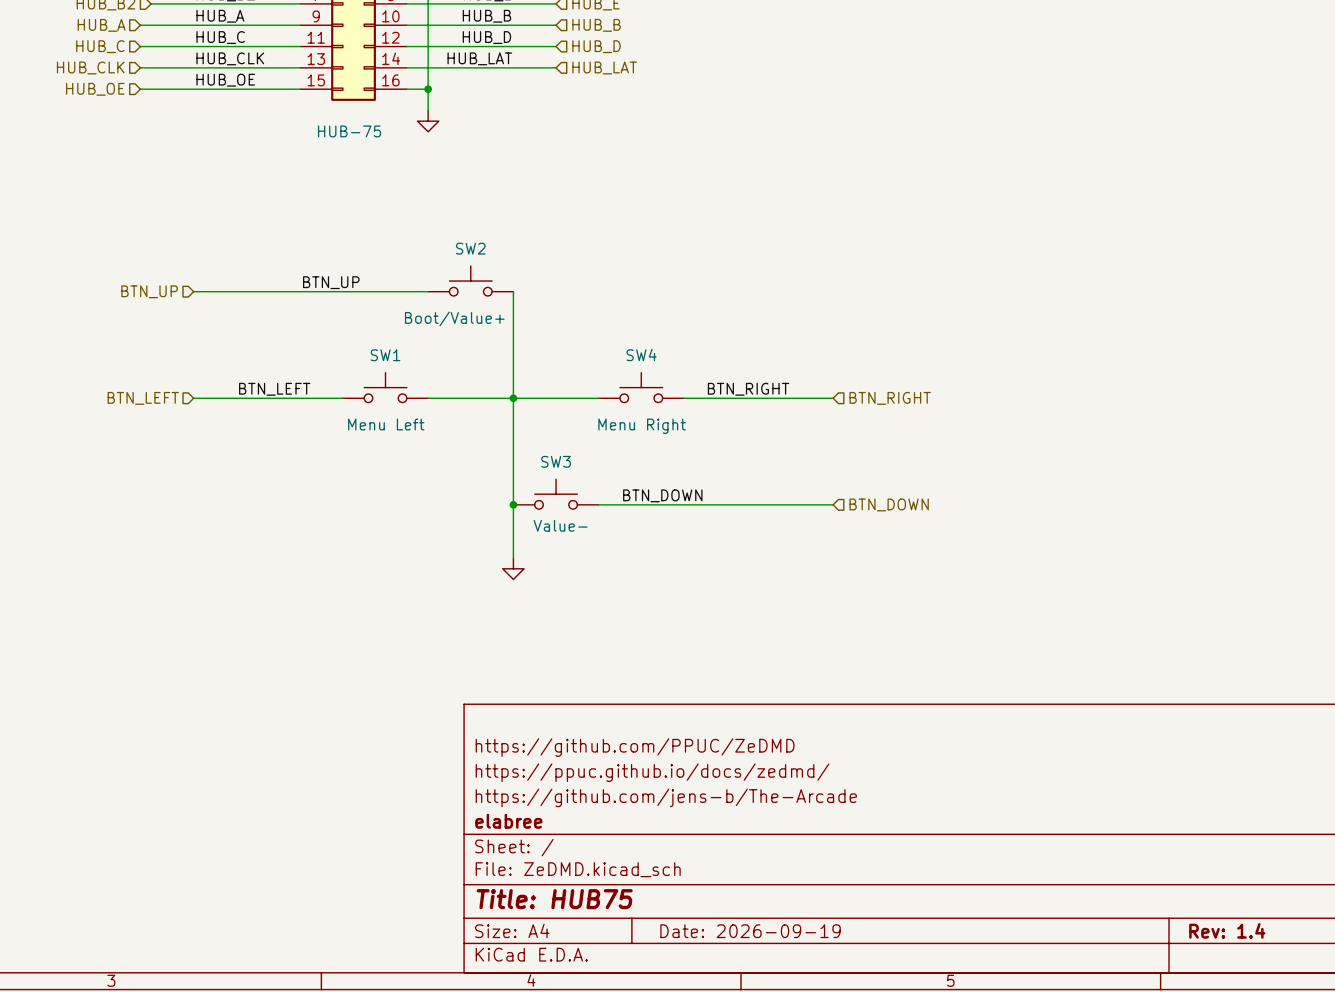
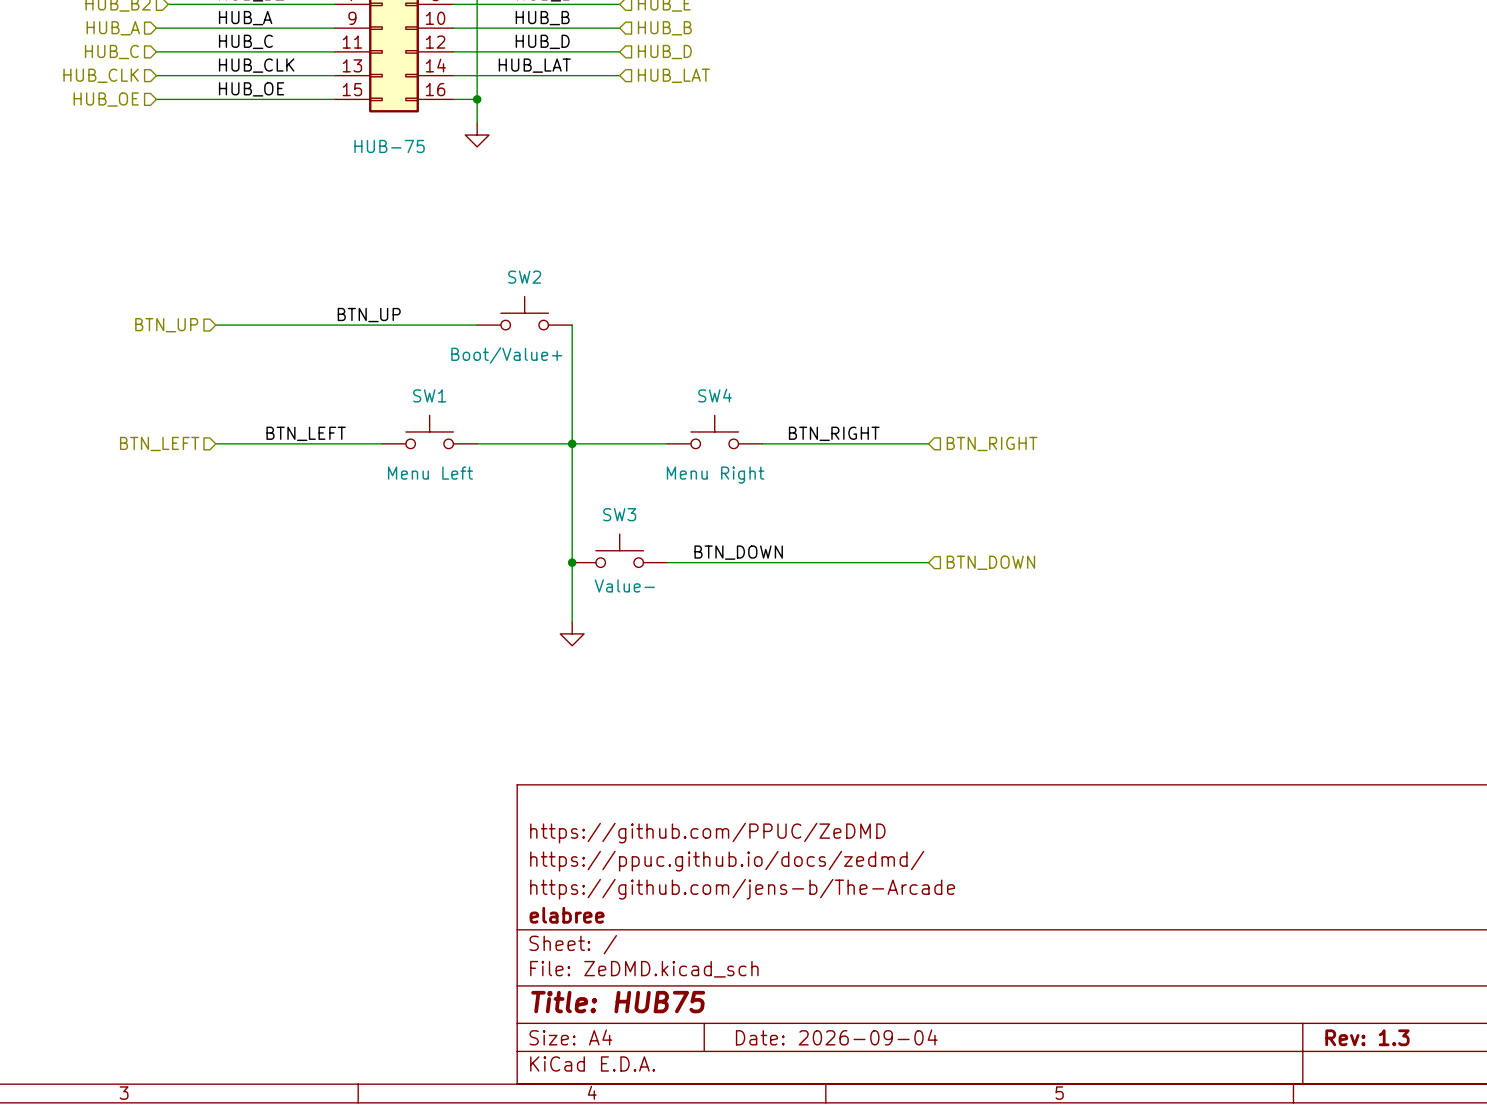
title block: Rev: 1.4 (1227, 930) -> Rev: 1.3 (1367, 1037)
title block: Date: 2026-09-19 (750, 931) -> Date: 2026-09-04 (836, 1037)

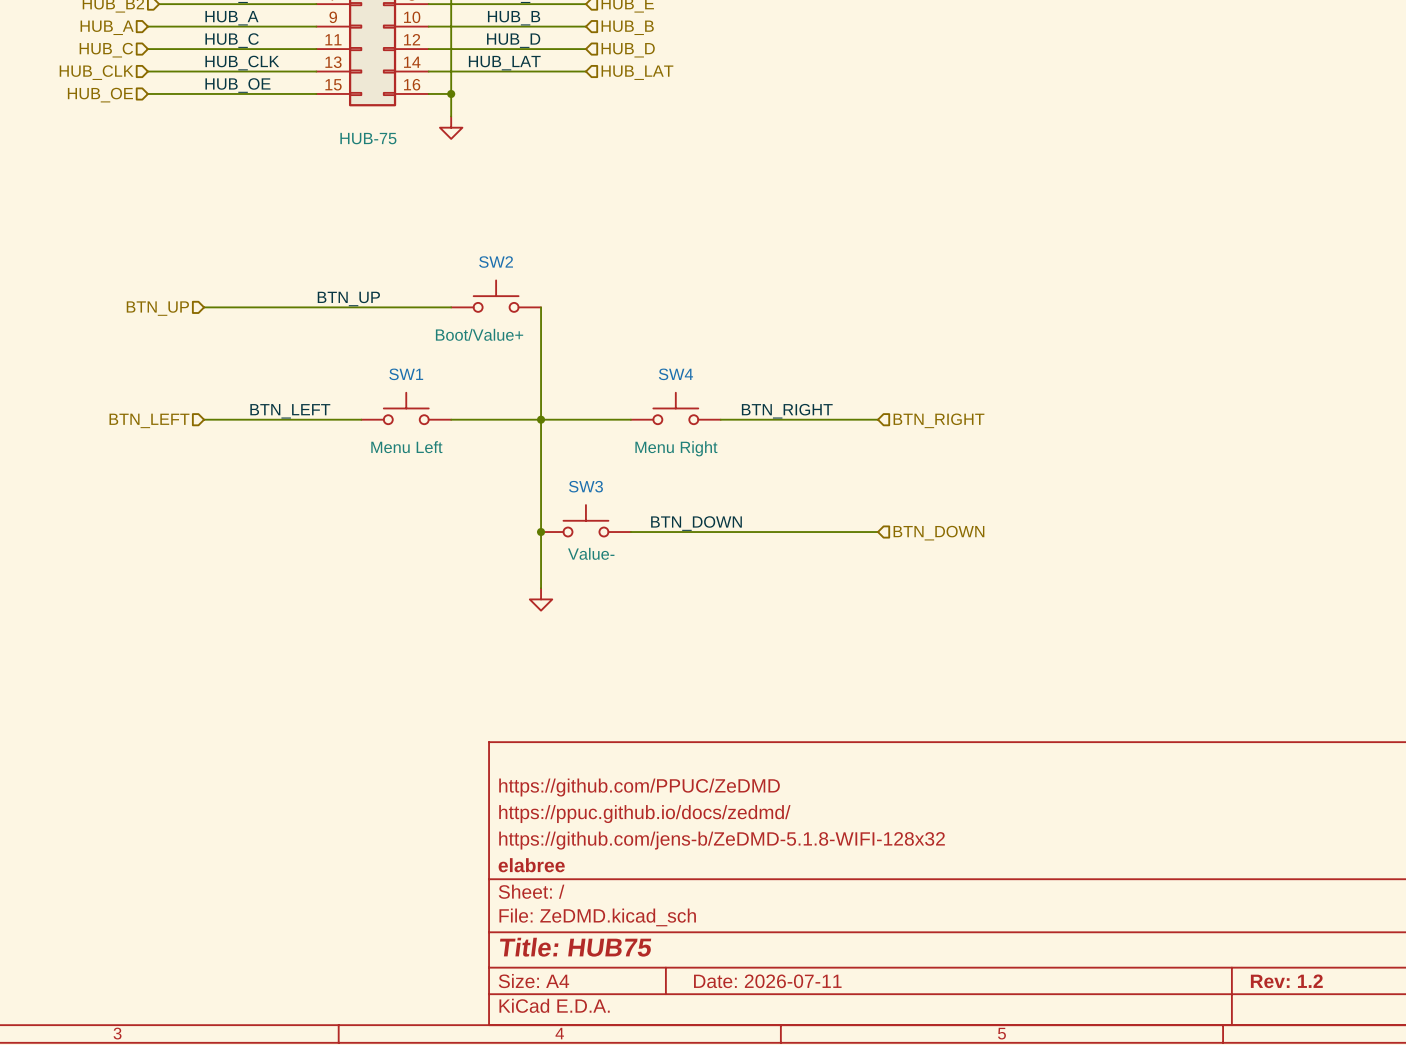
title block: https://github.com/jens-b/The-Arcade (742, 889) -> https://github.com/jens-b/ZeDMD-5.1.8-WIFI-128x32 (722, 840)
title block: Date: 2026-09-04 (836, 1037) -> Date: 2026-07-11 (767, 981)
title block: Rev: 1.3 (1367, 1037) -> Rev: 1.2 (1286, 981)

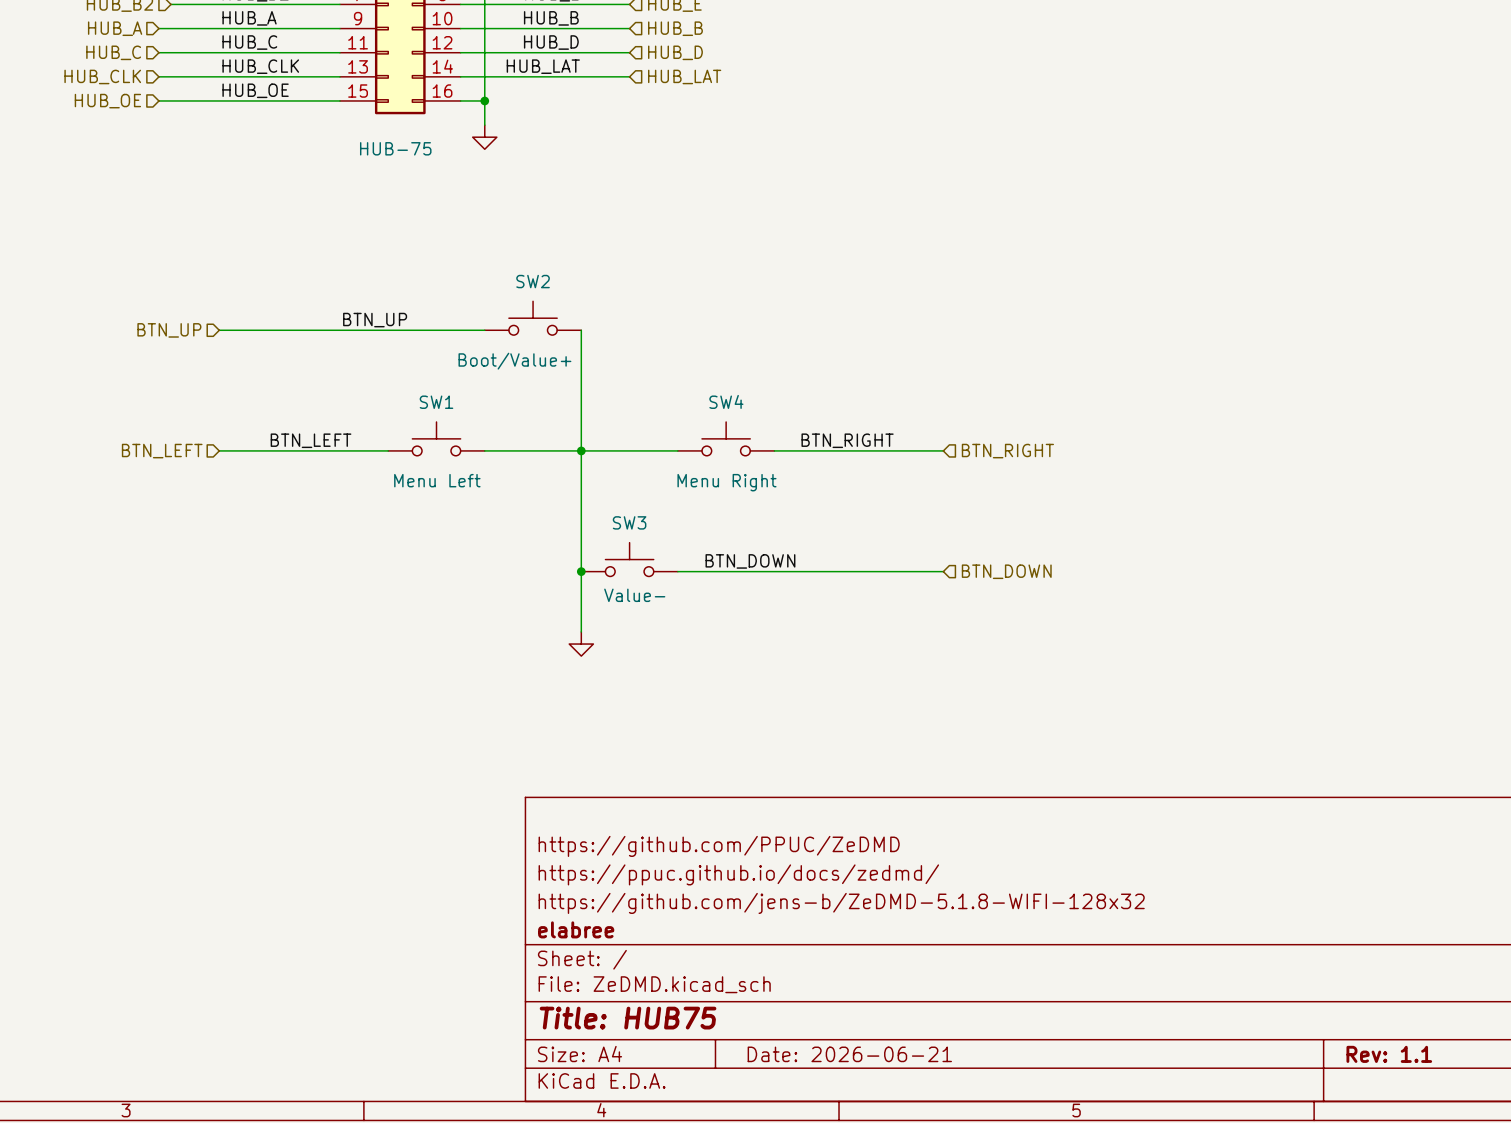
title block: Date: 2026-07-11 (767, 981) -> Date: 2026-06-21 (849, 1054)
title block: Rev: 1.2 (1286, 981) -> Rev: 1.1 (1389, 1054)

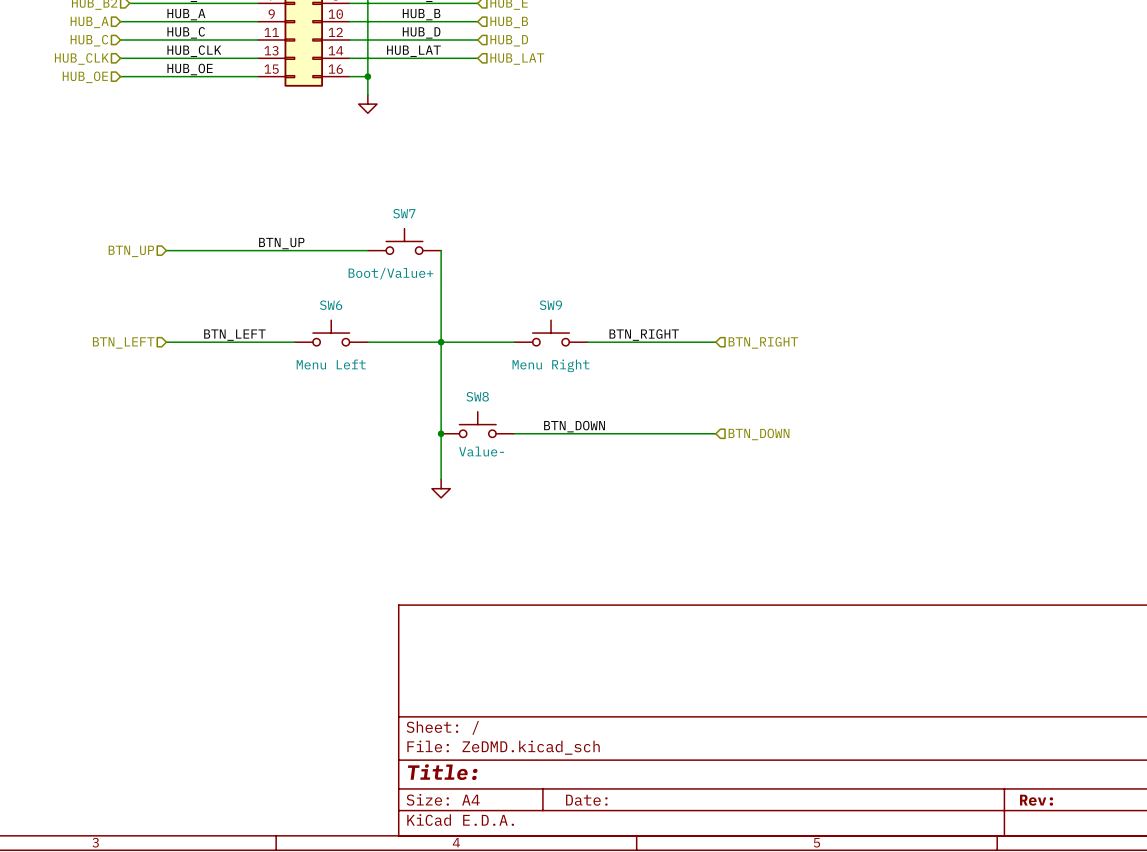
part text: HUB-75 (395, 148) -> none
SW2 name: SW2 (533, 281) -> SW7 (404, 213)
SW4 name: SW4 (726, 401) -> SW9 (550, 305)
SW1 name: SW1 (436, 402) -> SW6 (331, 305)
SW3 name: SW3 (629, 522) -> SW8 (477, 396)
title block: https://github.com/PPUC/ZeDMD (719, 846) -> none
title block: https://ppuc.github.io/docs/zedmd/ (738, 874) -> none
title block: https://github.com/jens-b/ZeDMD-5.1.8-WIFI-128x32 (841, 903) -> none
title block: elabree (576, 929) -> none
title block: Title: HUB75 (628, 1018) -> Title: (442, 772)
title block: Date: 2026-06-21 (849, 1054) -> Date: (586, 800)
title block: Rev: 1.1 (1389, 1054) -> Rev: (1036, 800)

